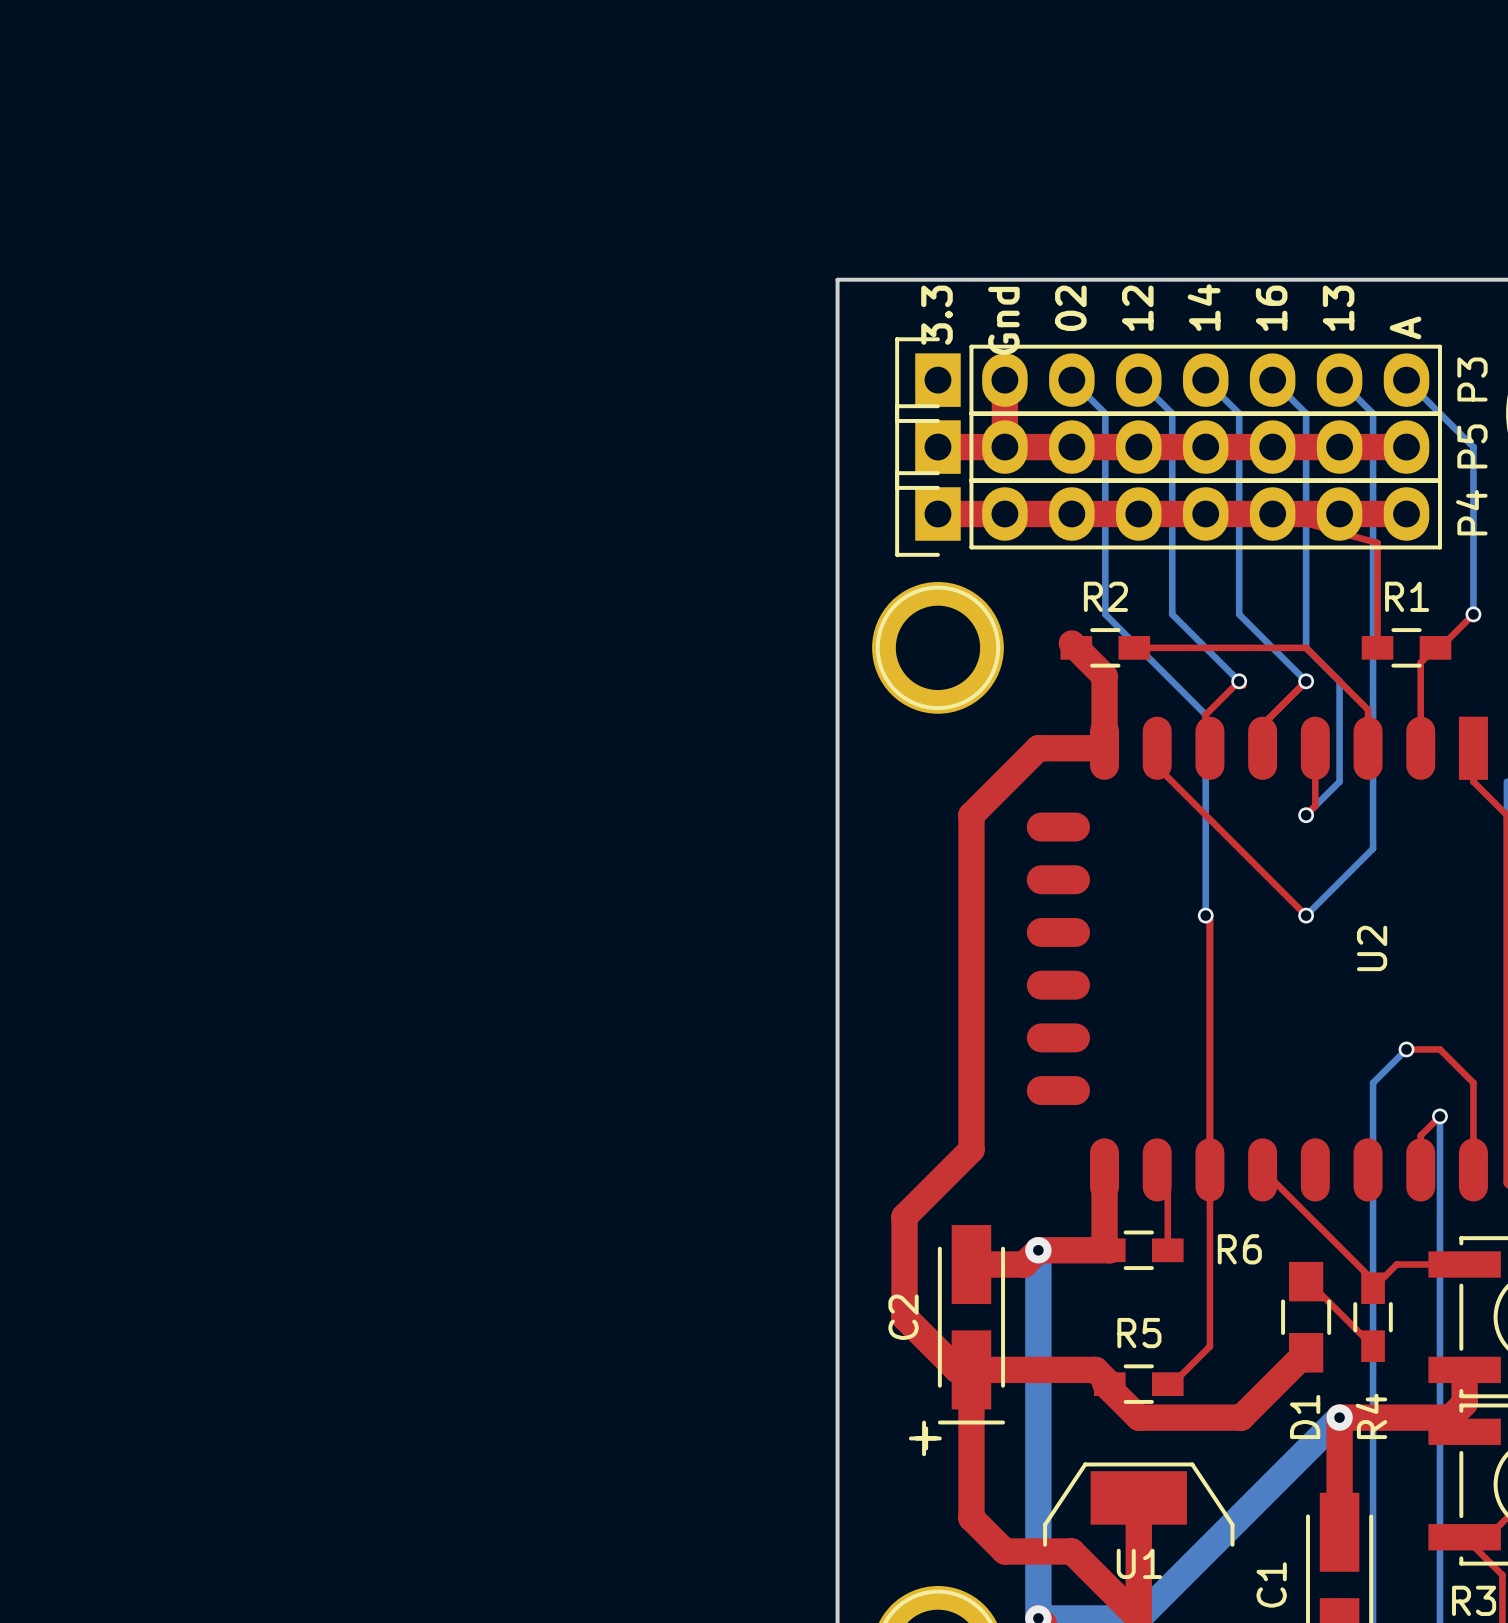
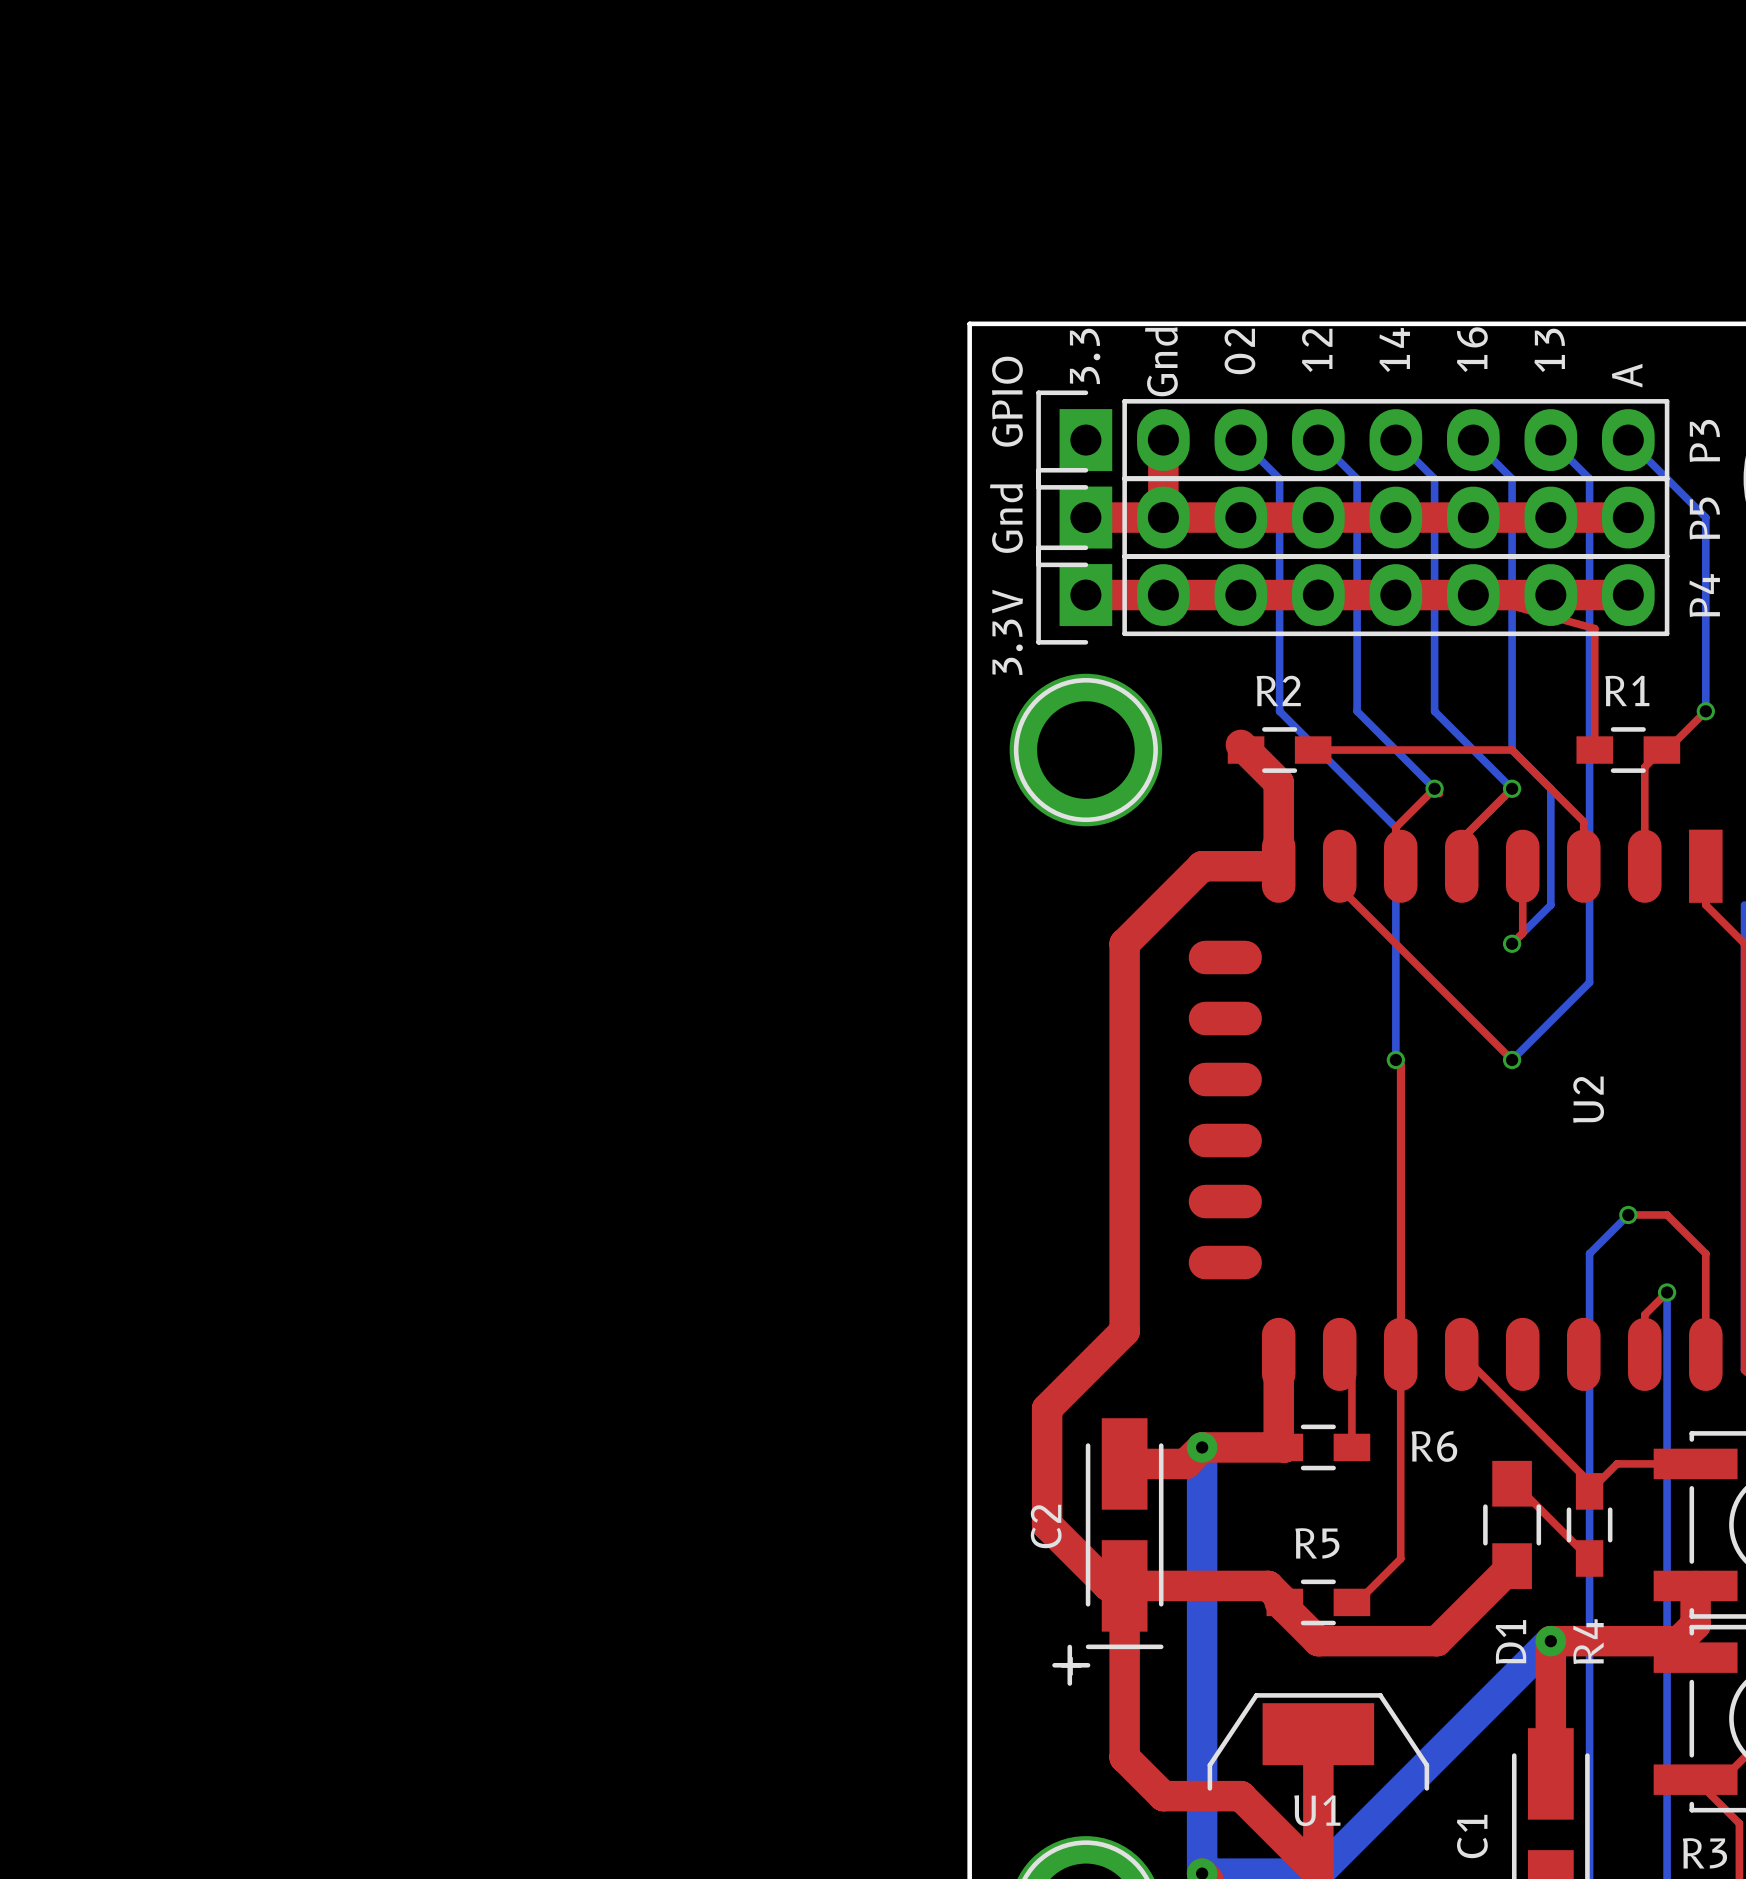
P3 value: none -> GPIO (1007, 401)
P5 value: none -> Gnd (1006, 518)
P4 value: none -> 3.3V (1007, 632)

